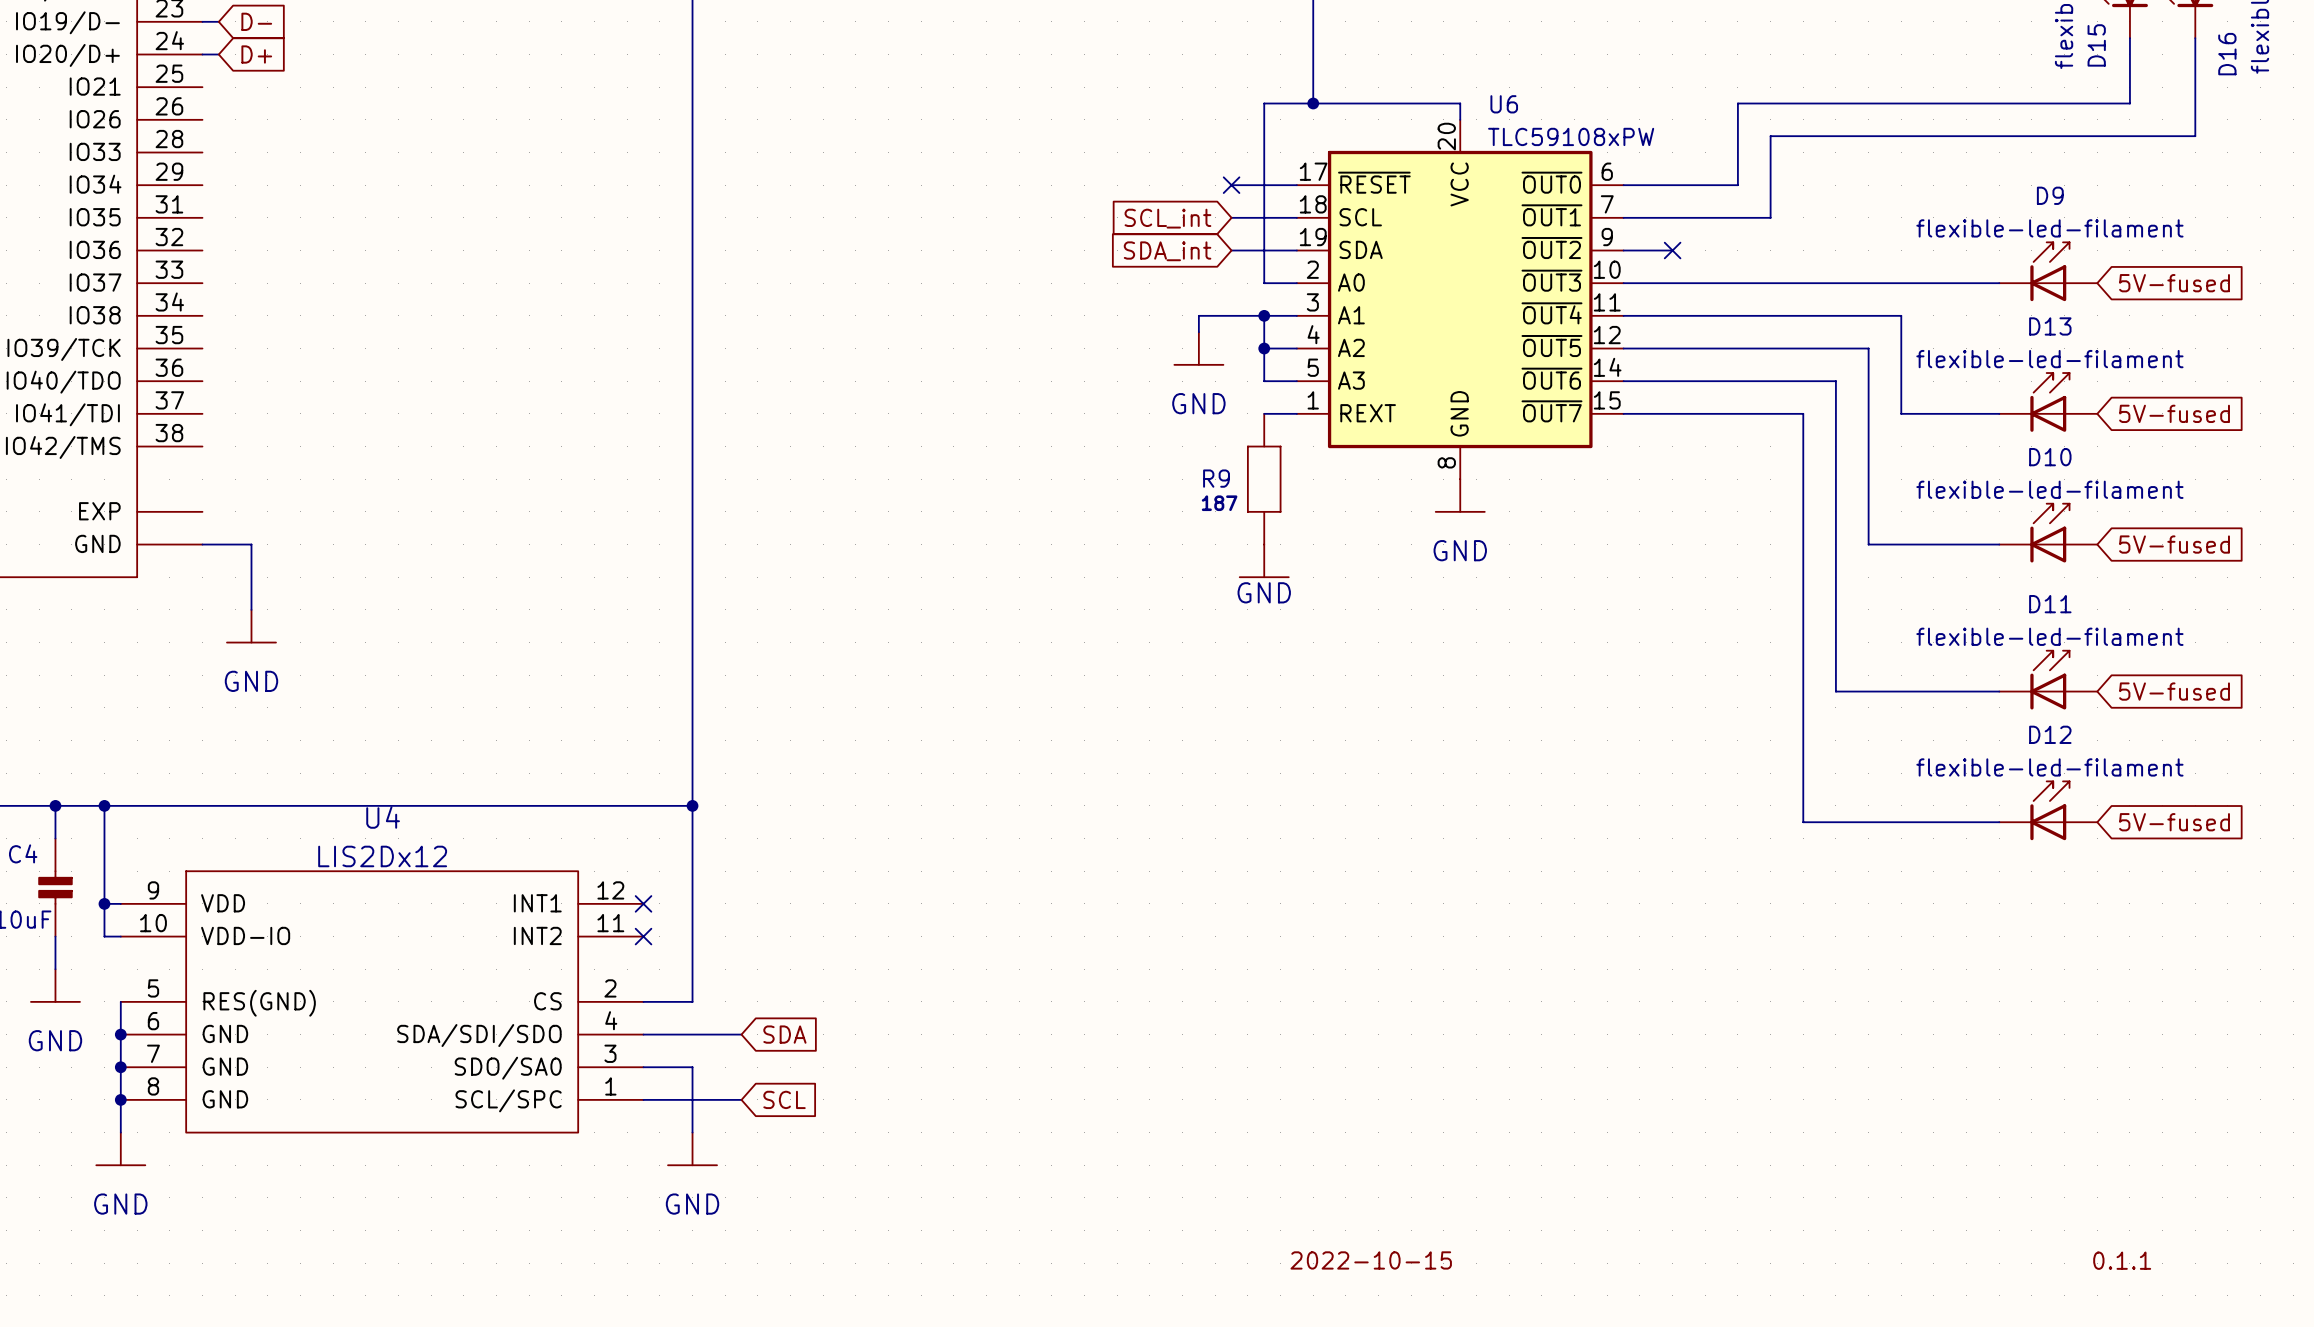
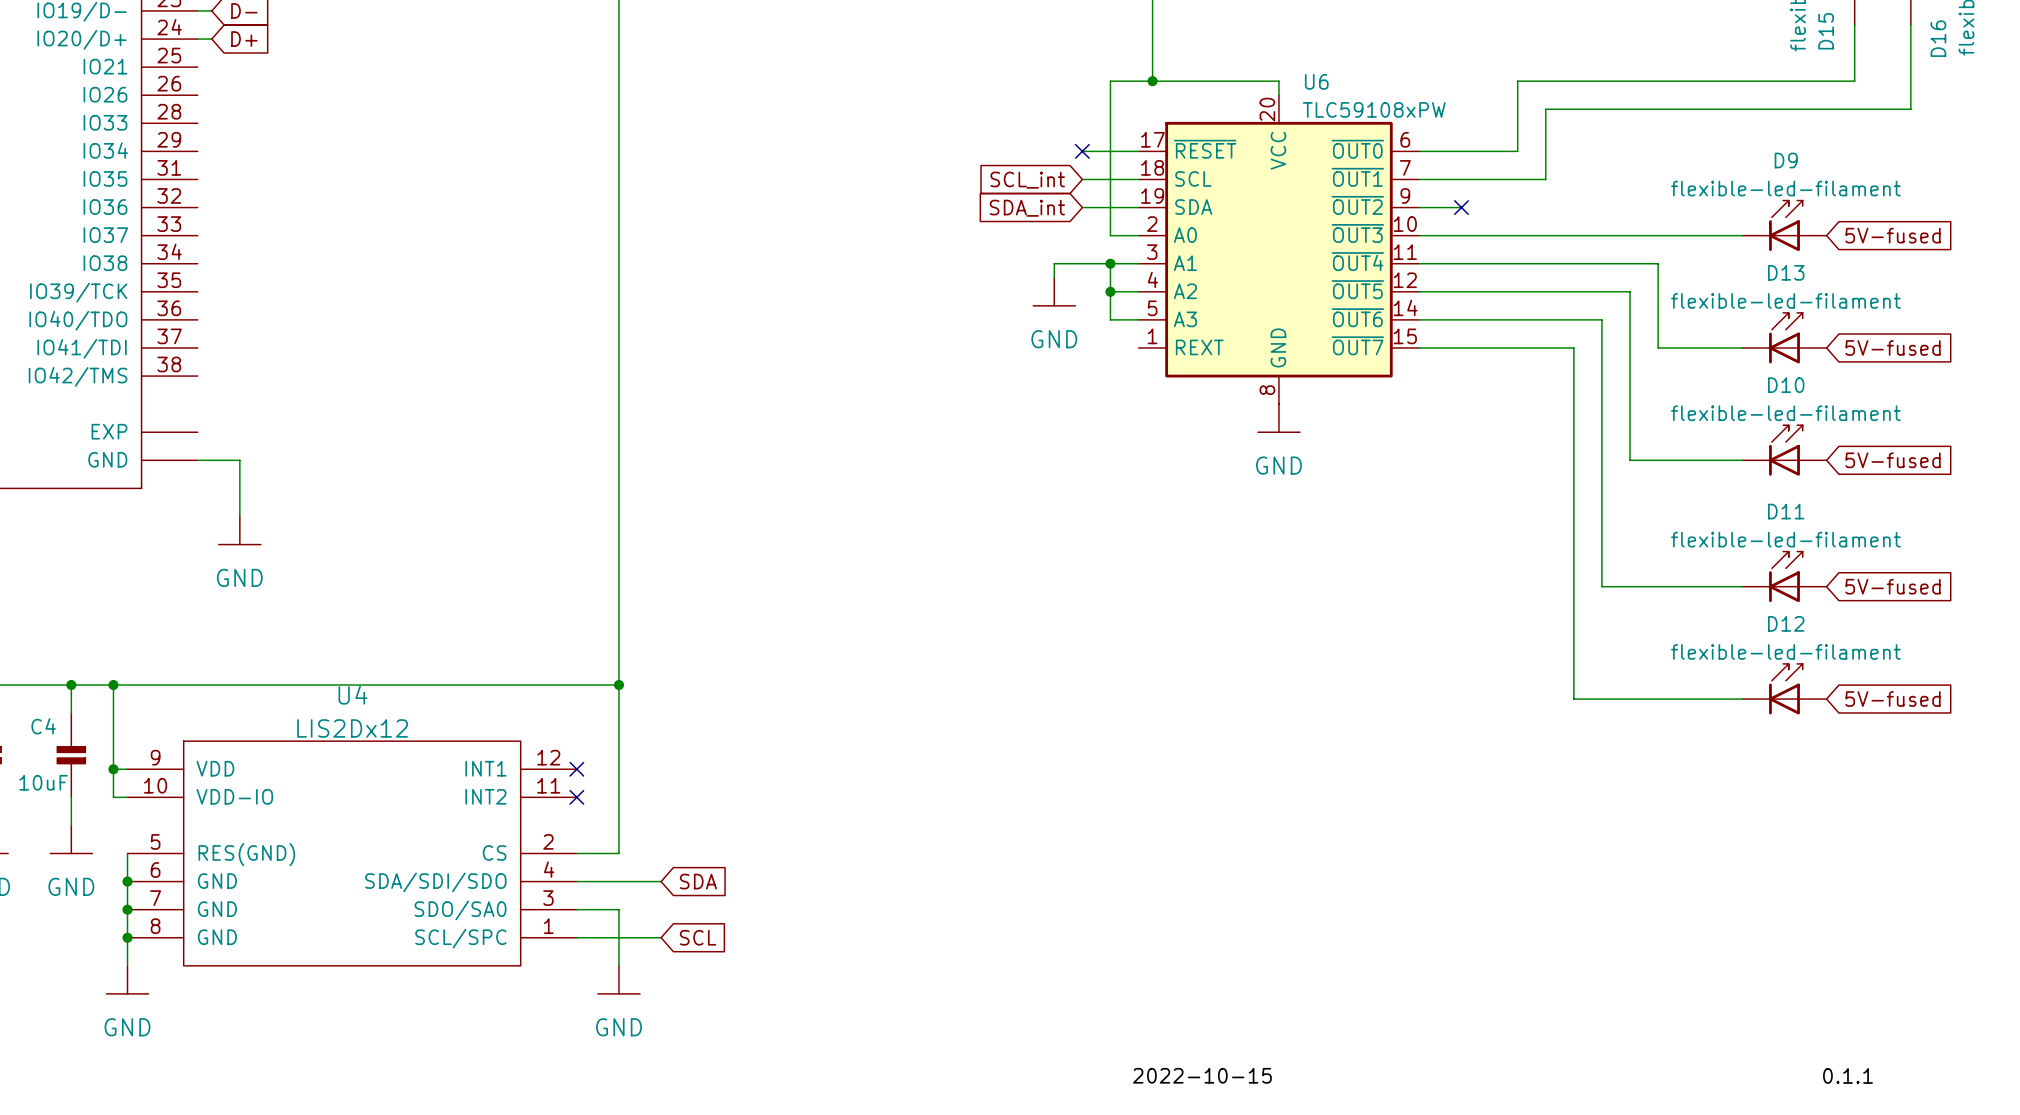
wire: (1264, 413) (1296, 413) -> none
R9: 187 (1264, 479) -> none
power symbol: GND (1264, 560) -> none

